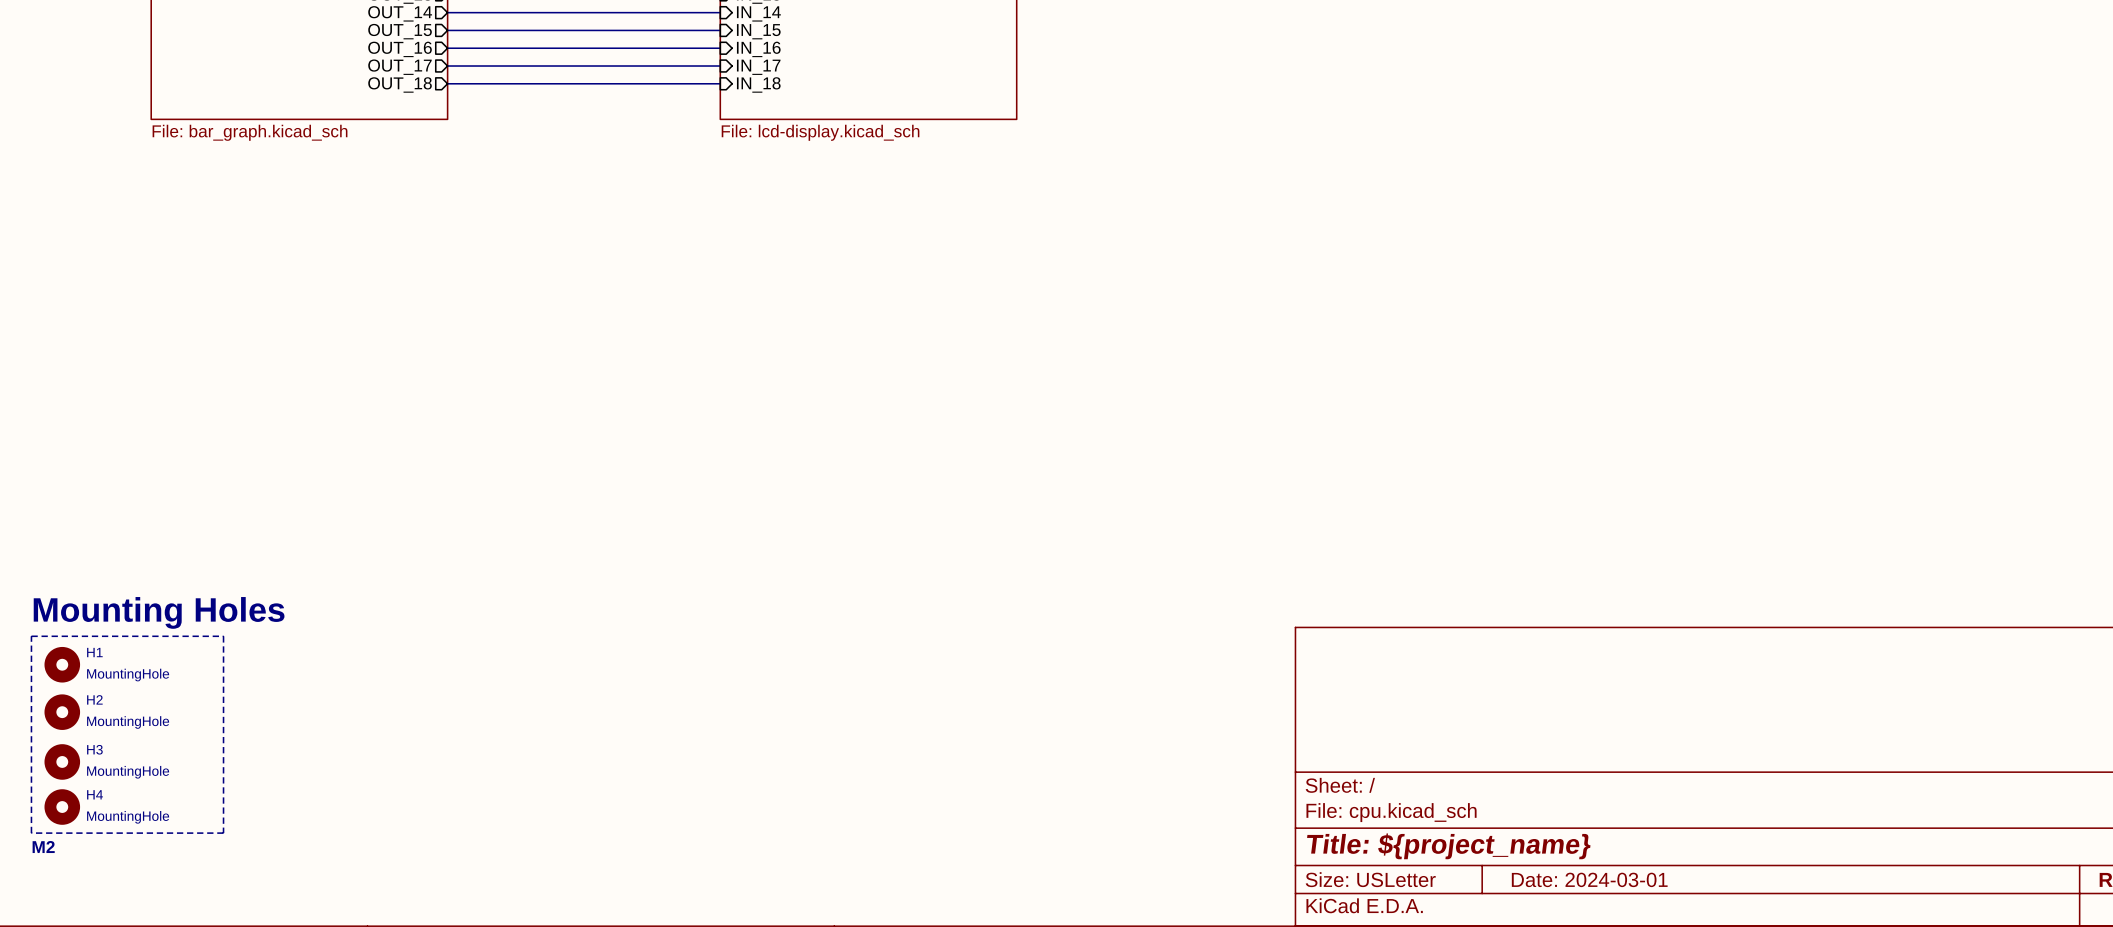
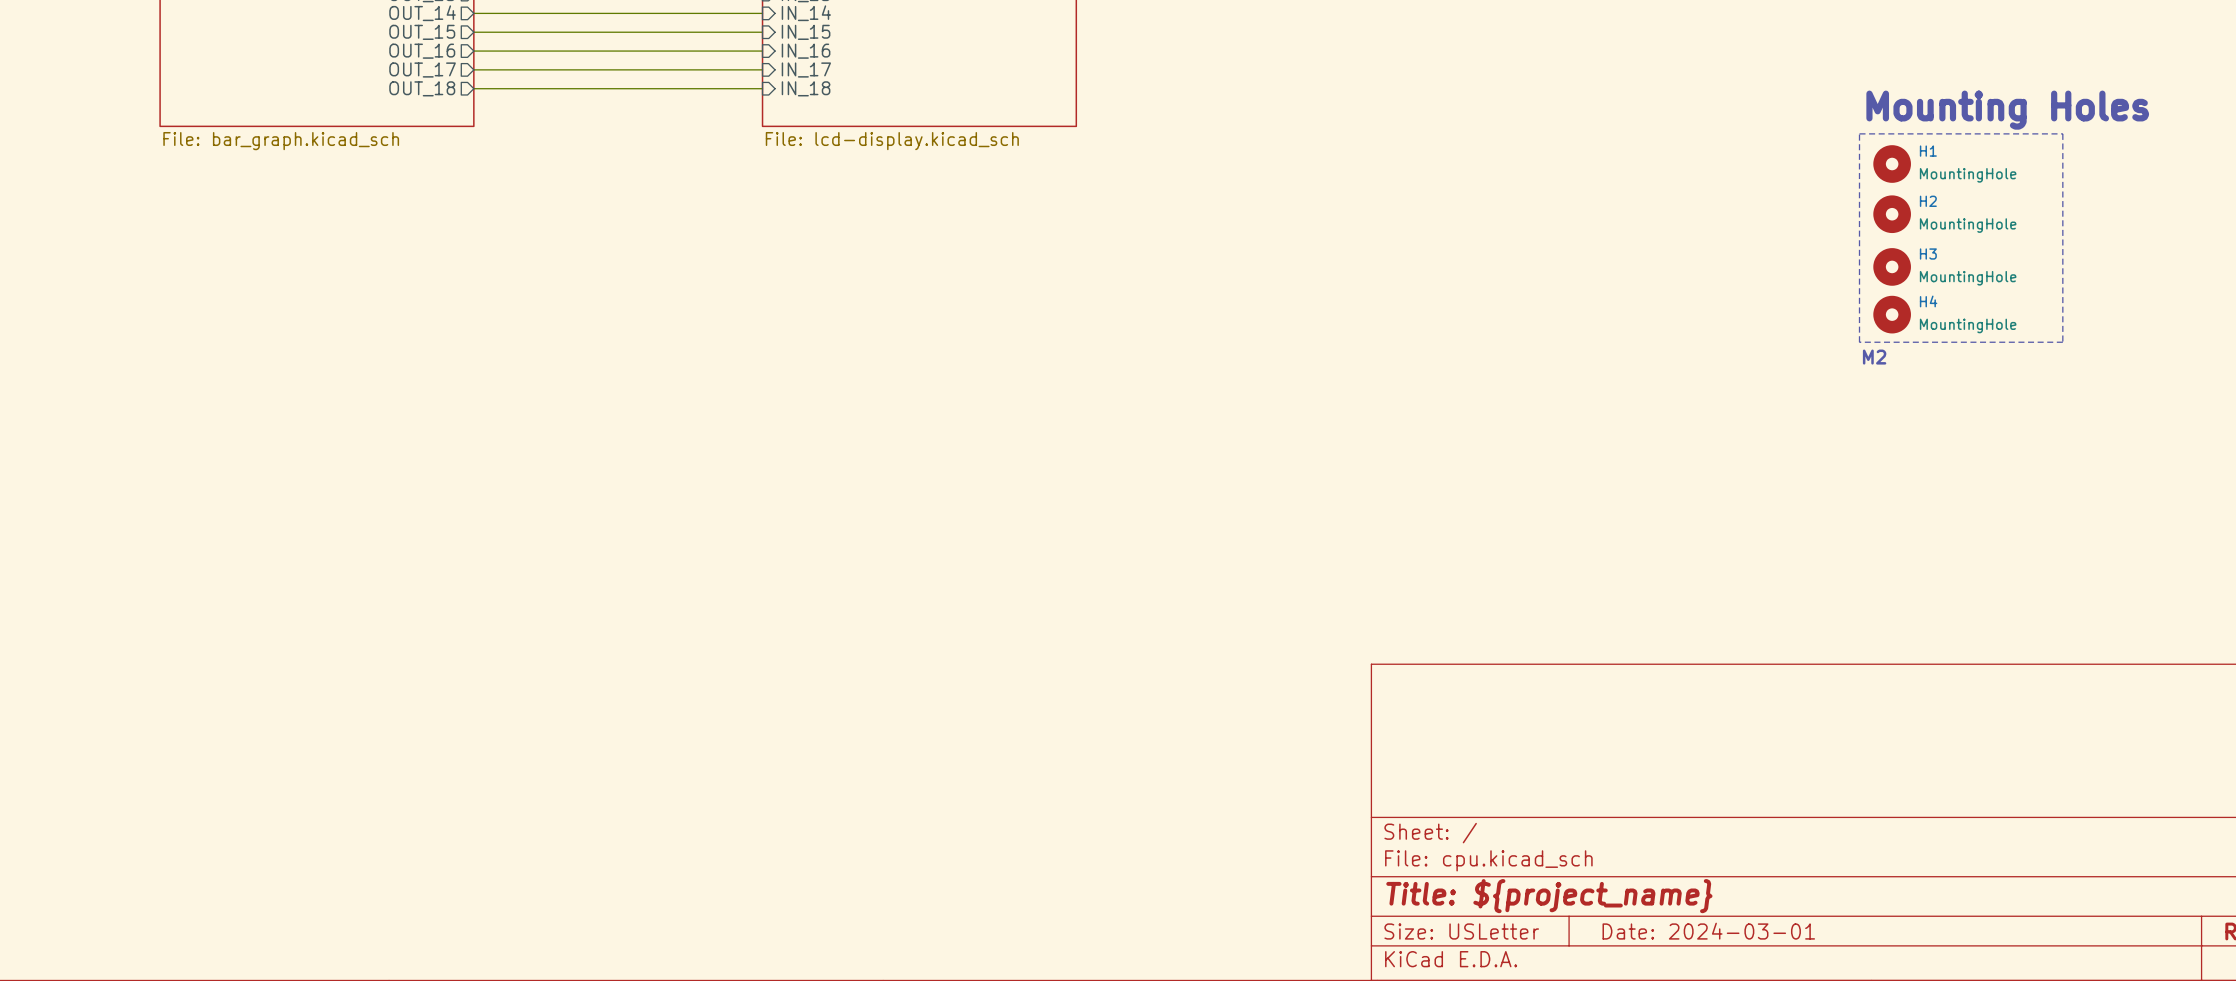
text: none -> Mounting Holes (2007, 110)
line: none -> (1859, 133) (2062, 133) (2062, 342) (1859, 342) (1859, 133)
text: none -> M2 (1874, 357)
text: Mounting Holes (159, 612) -> none
line: (31, 636) (223, 636) (223, 833) (31, 833) (31, 636) -> none
H1 position: (62, 664) -> (1892, 164)
H2 position: (62, 712) -> (1892, 214)
H3 position: (62, 761) -> (1892, 266)
H4 position: (62, 807) -> (1892, 314)
text: M2 (43, 847) -> none

